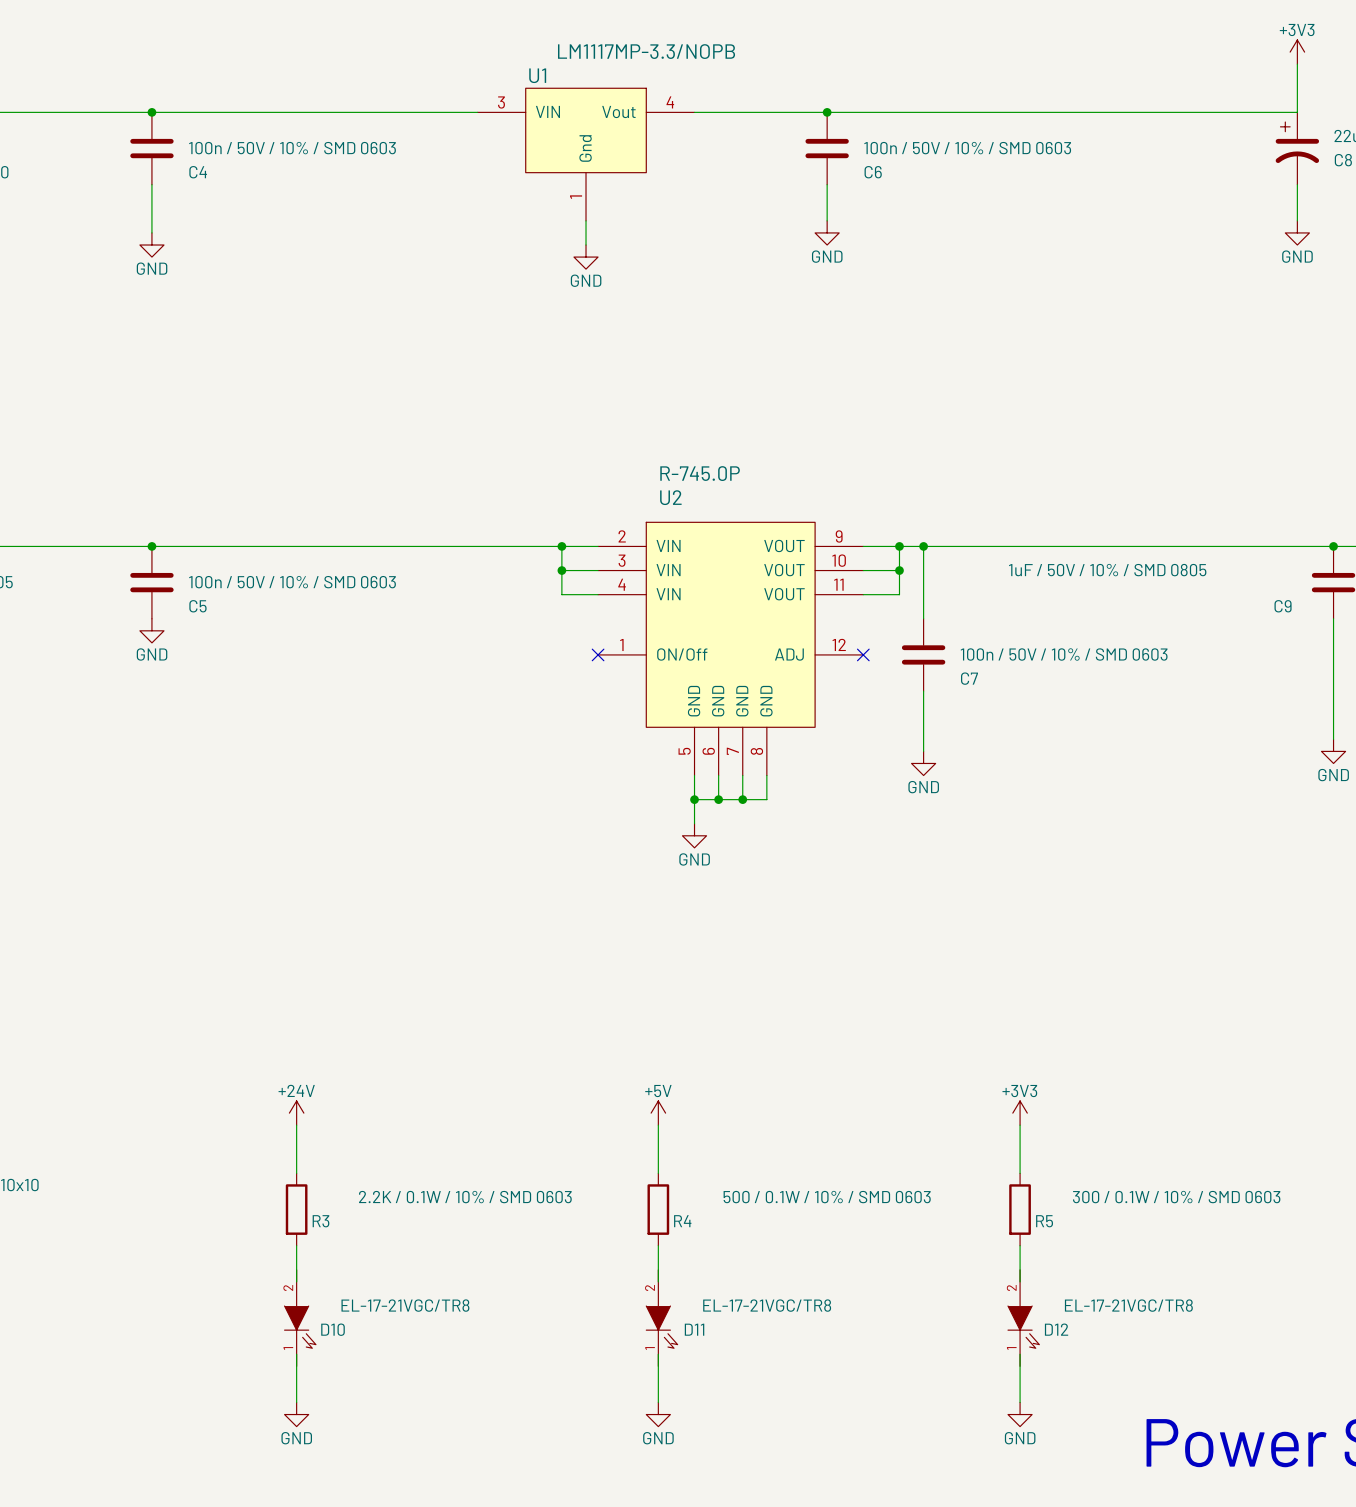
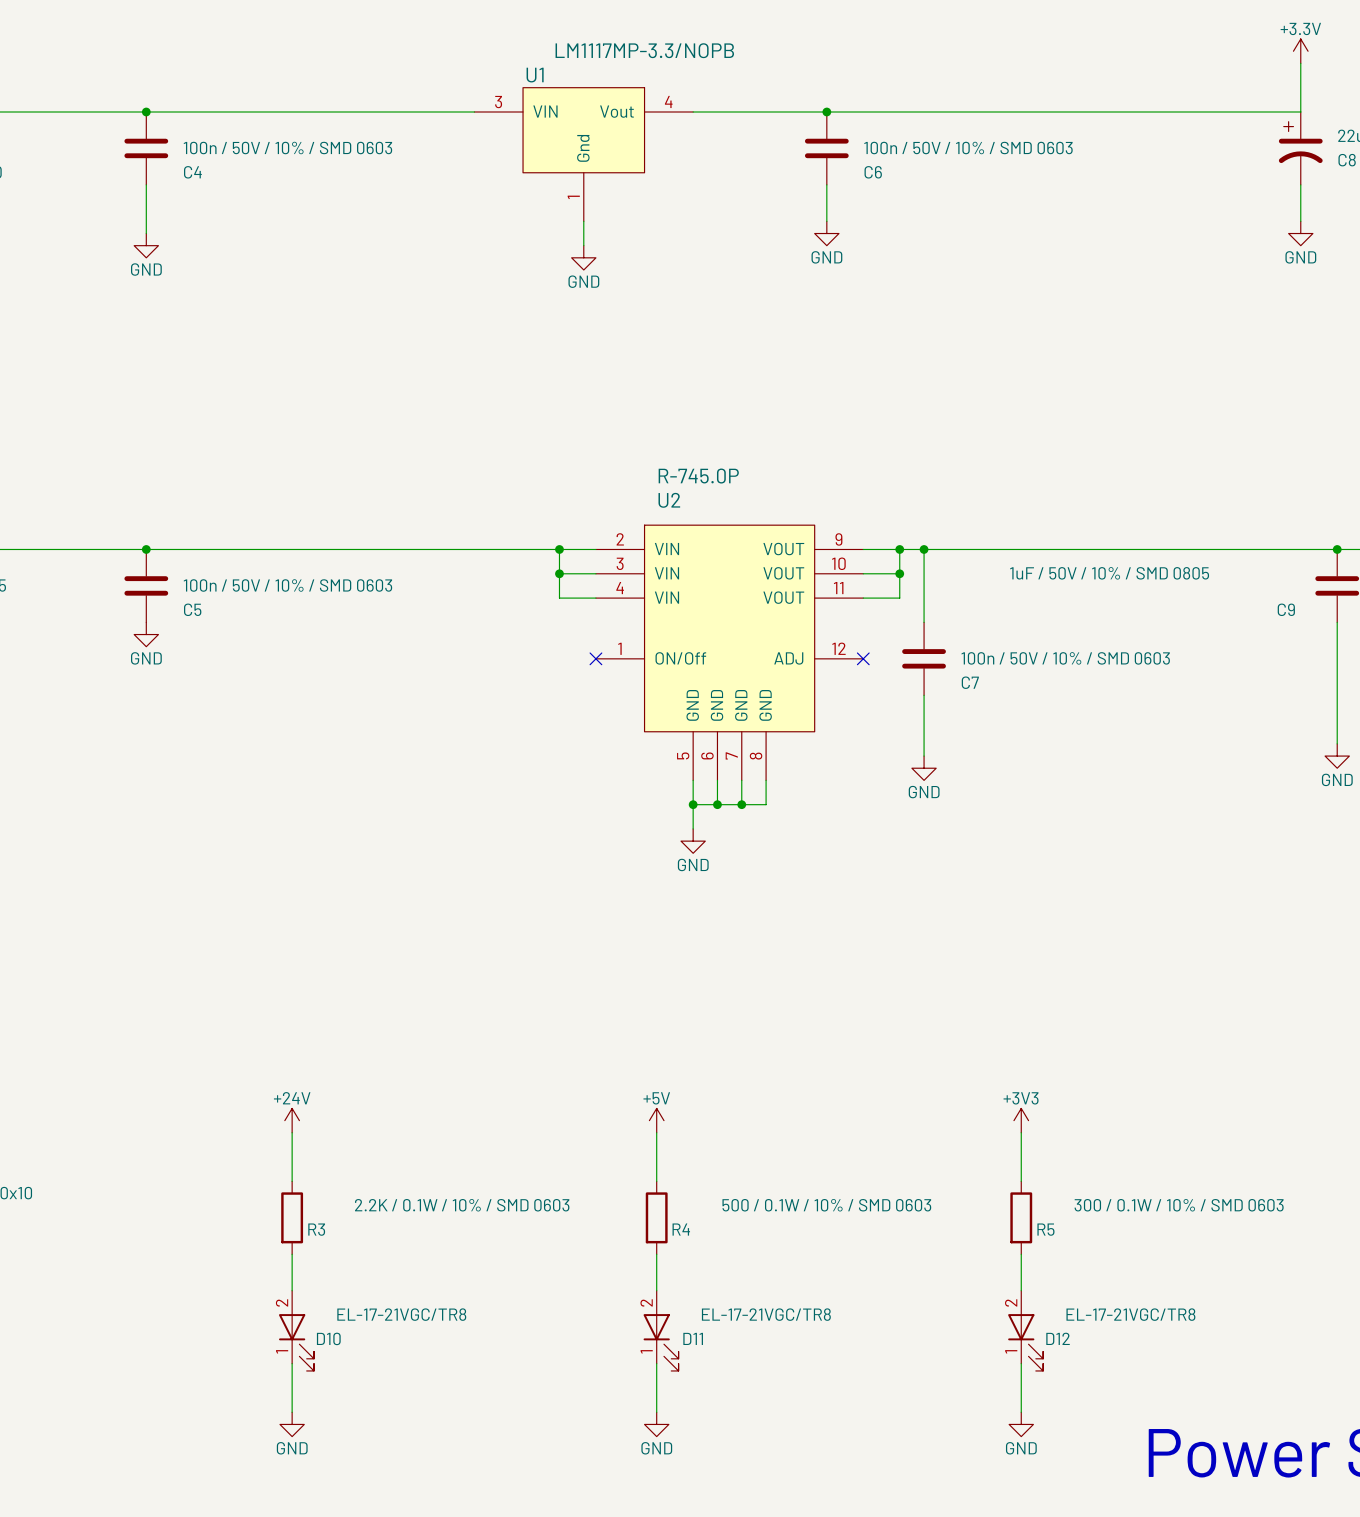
power symbol: +3V3 (1297, 52) -> +3.3V (1300, 51)
D10 symbol: [284, 1269, 316, 1367] -> [279, 1290, 315, 1371]
D11 symbol: [646, 1269, 678, 1367] -> [643, 1290, 679, 1371]
D12 symbol: [1008, 1269, 1040, 1367] -> [1008, 1290, 1044, 1371]

